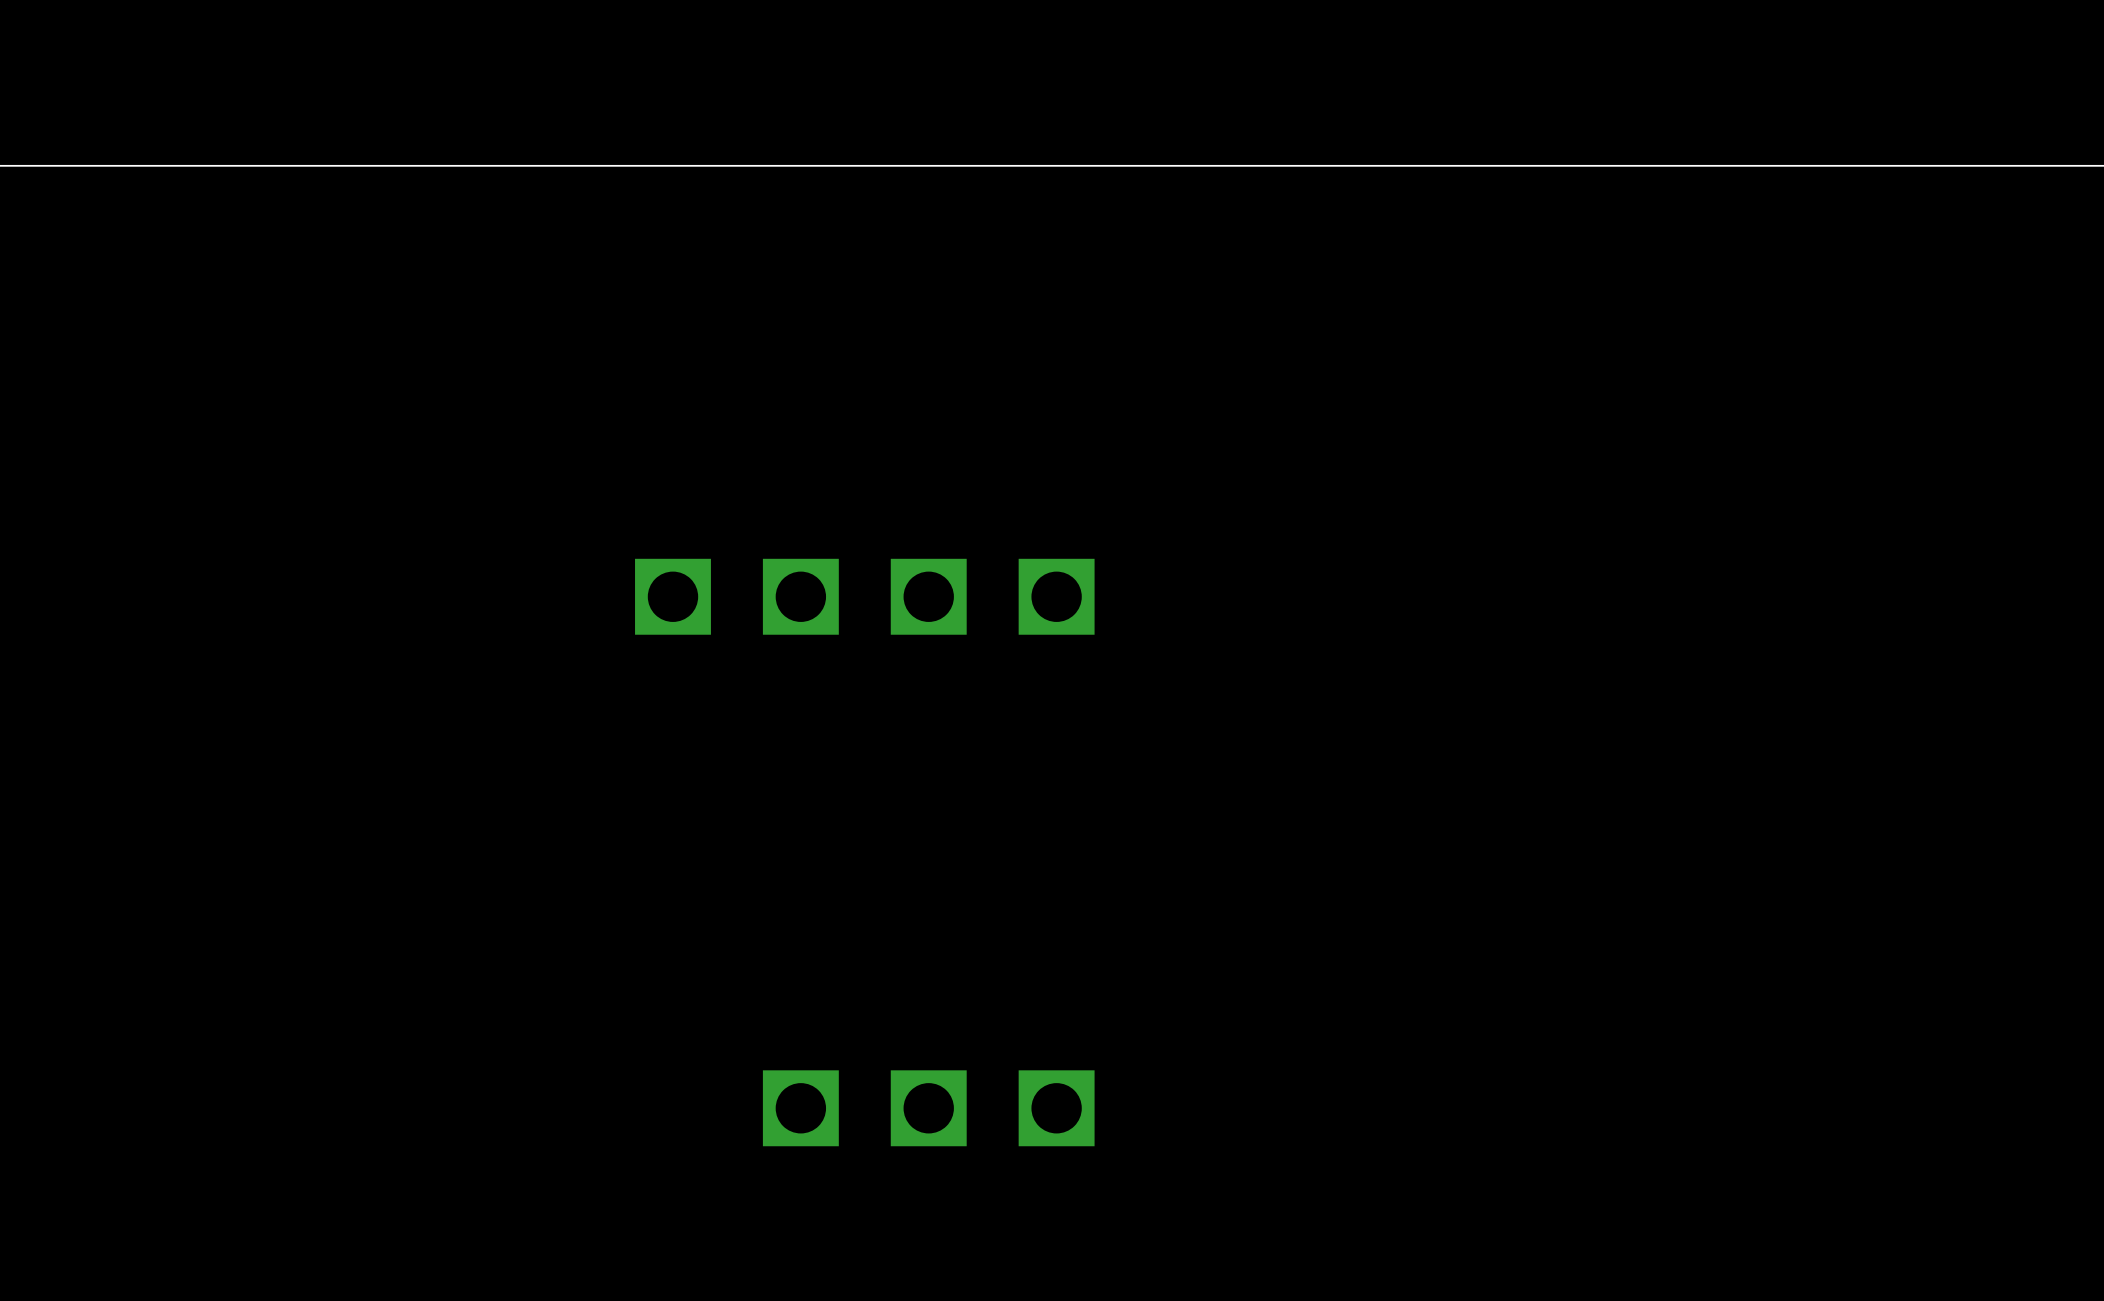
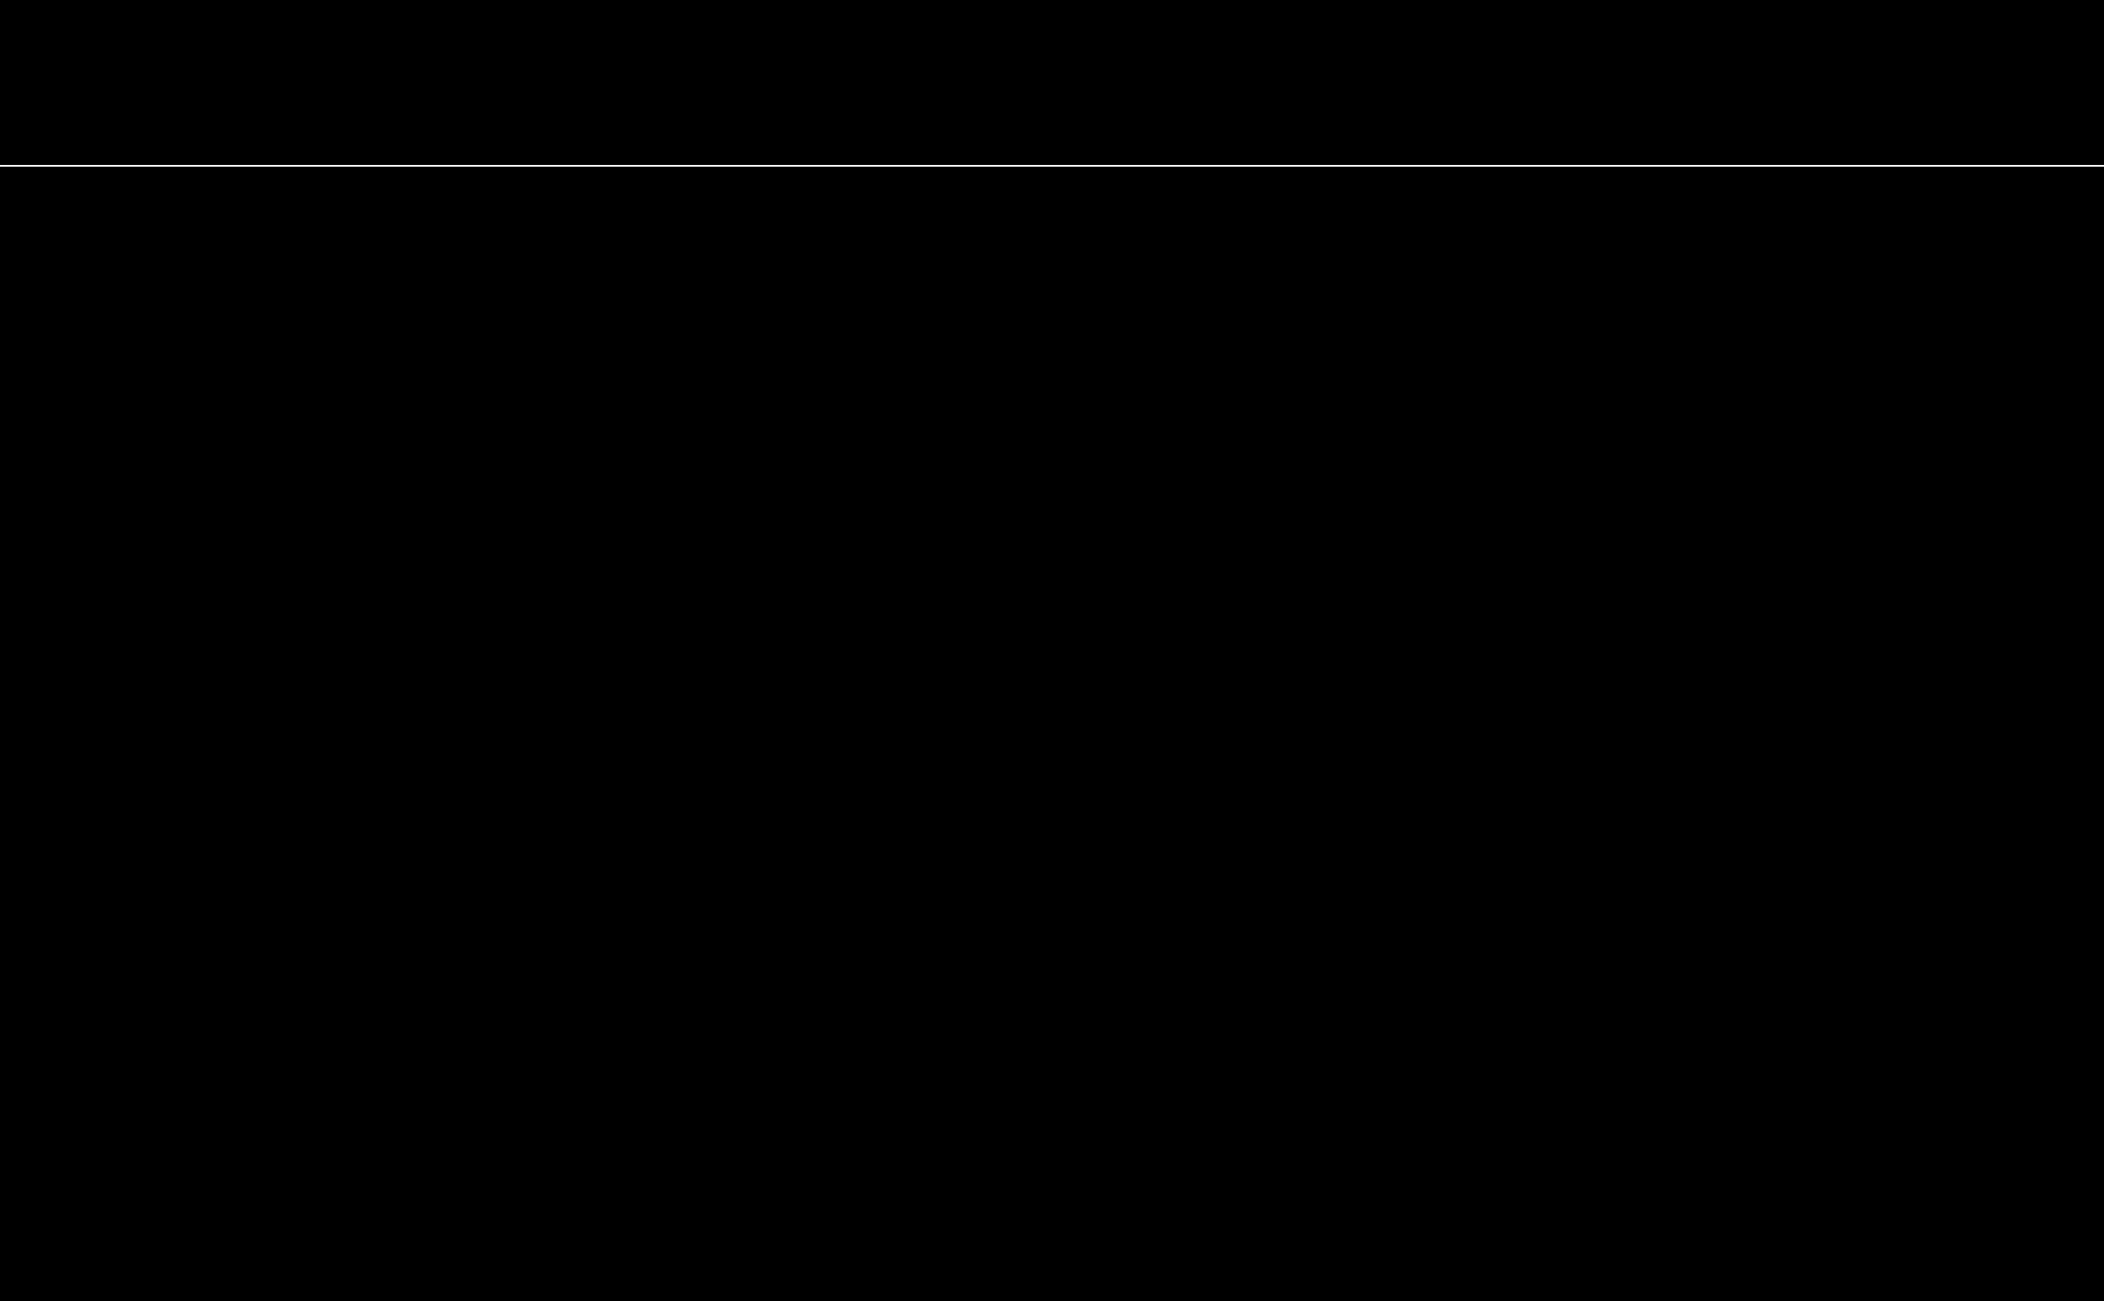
part: (864, 596) -> none
part: (928, 1108) -> none

